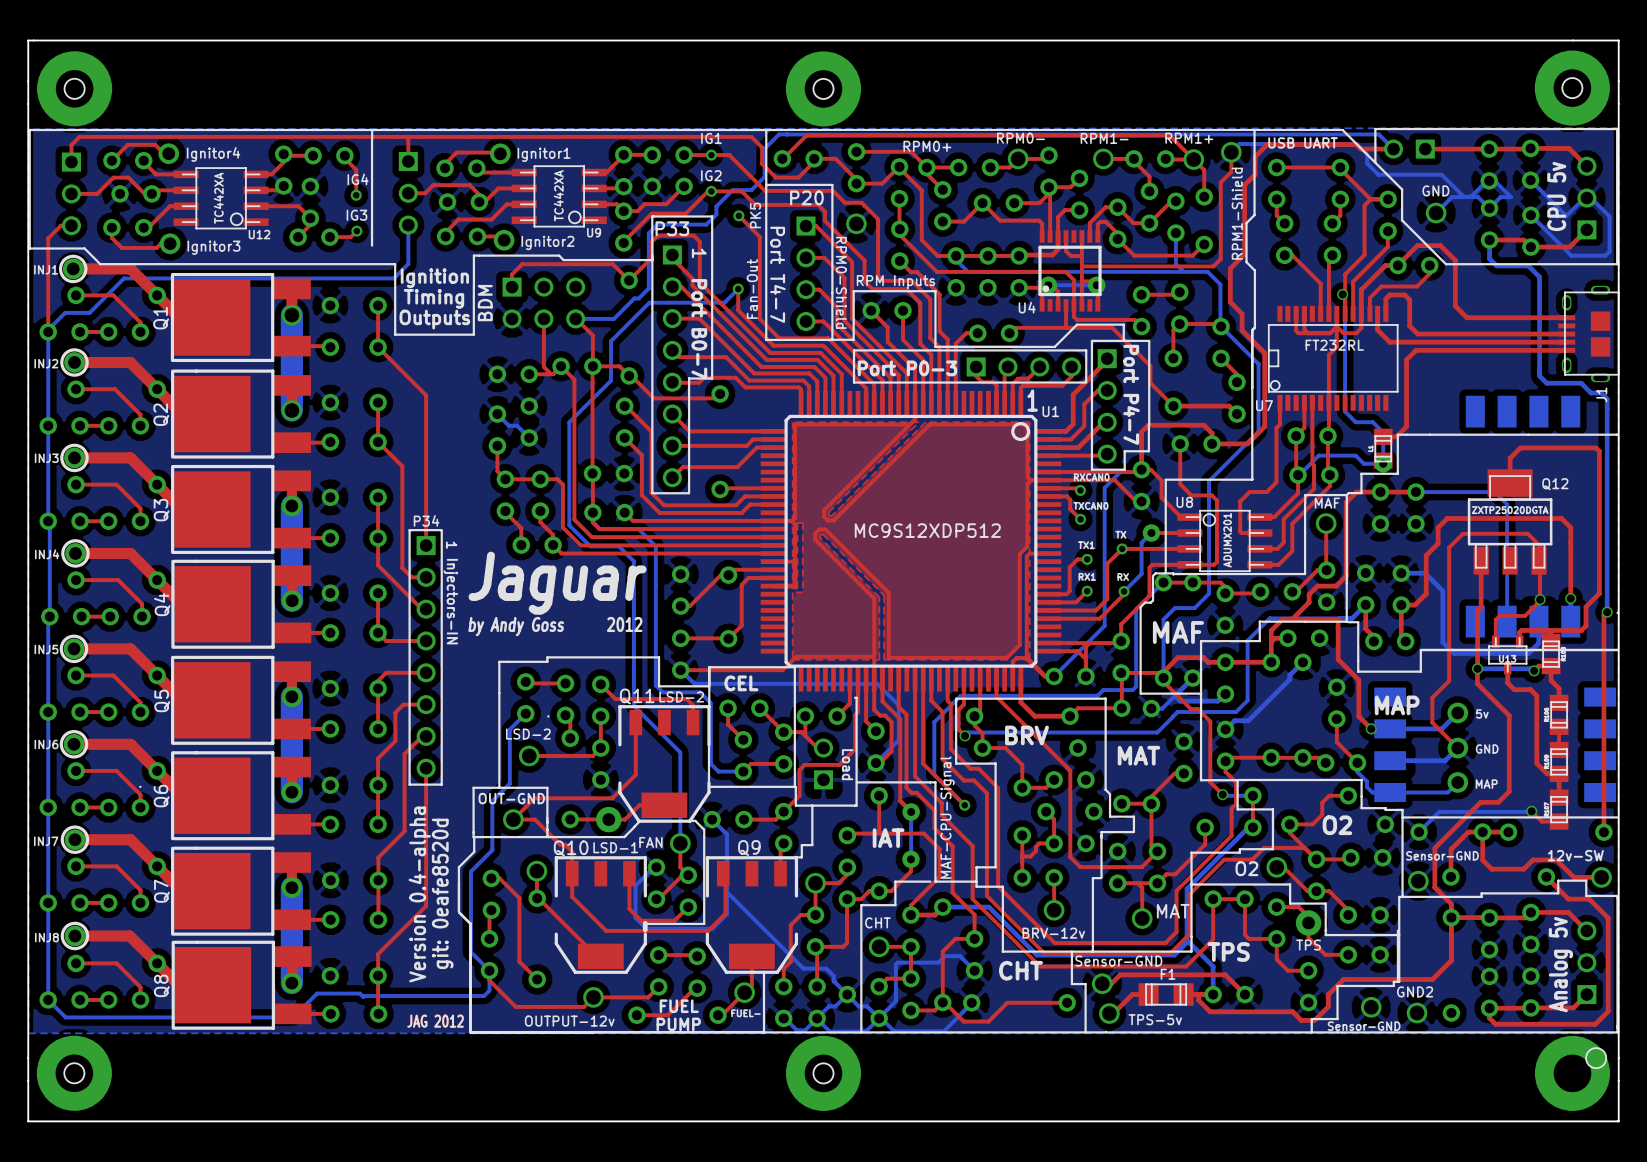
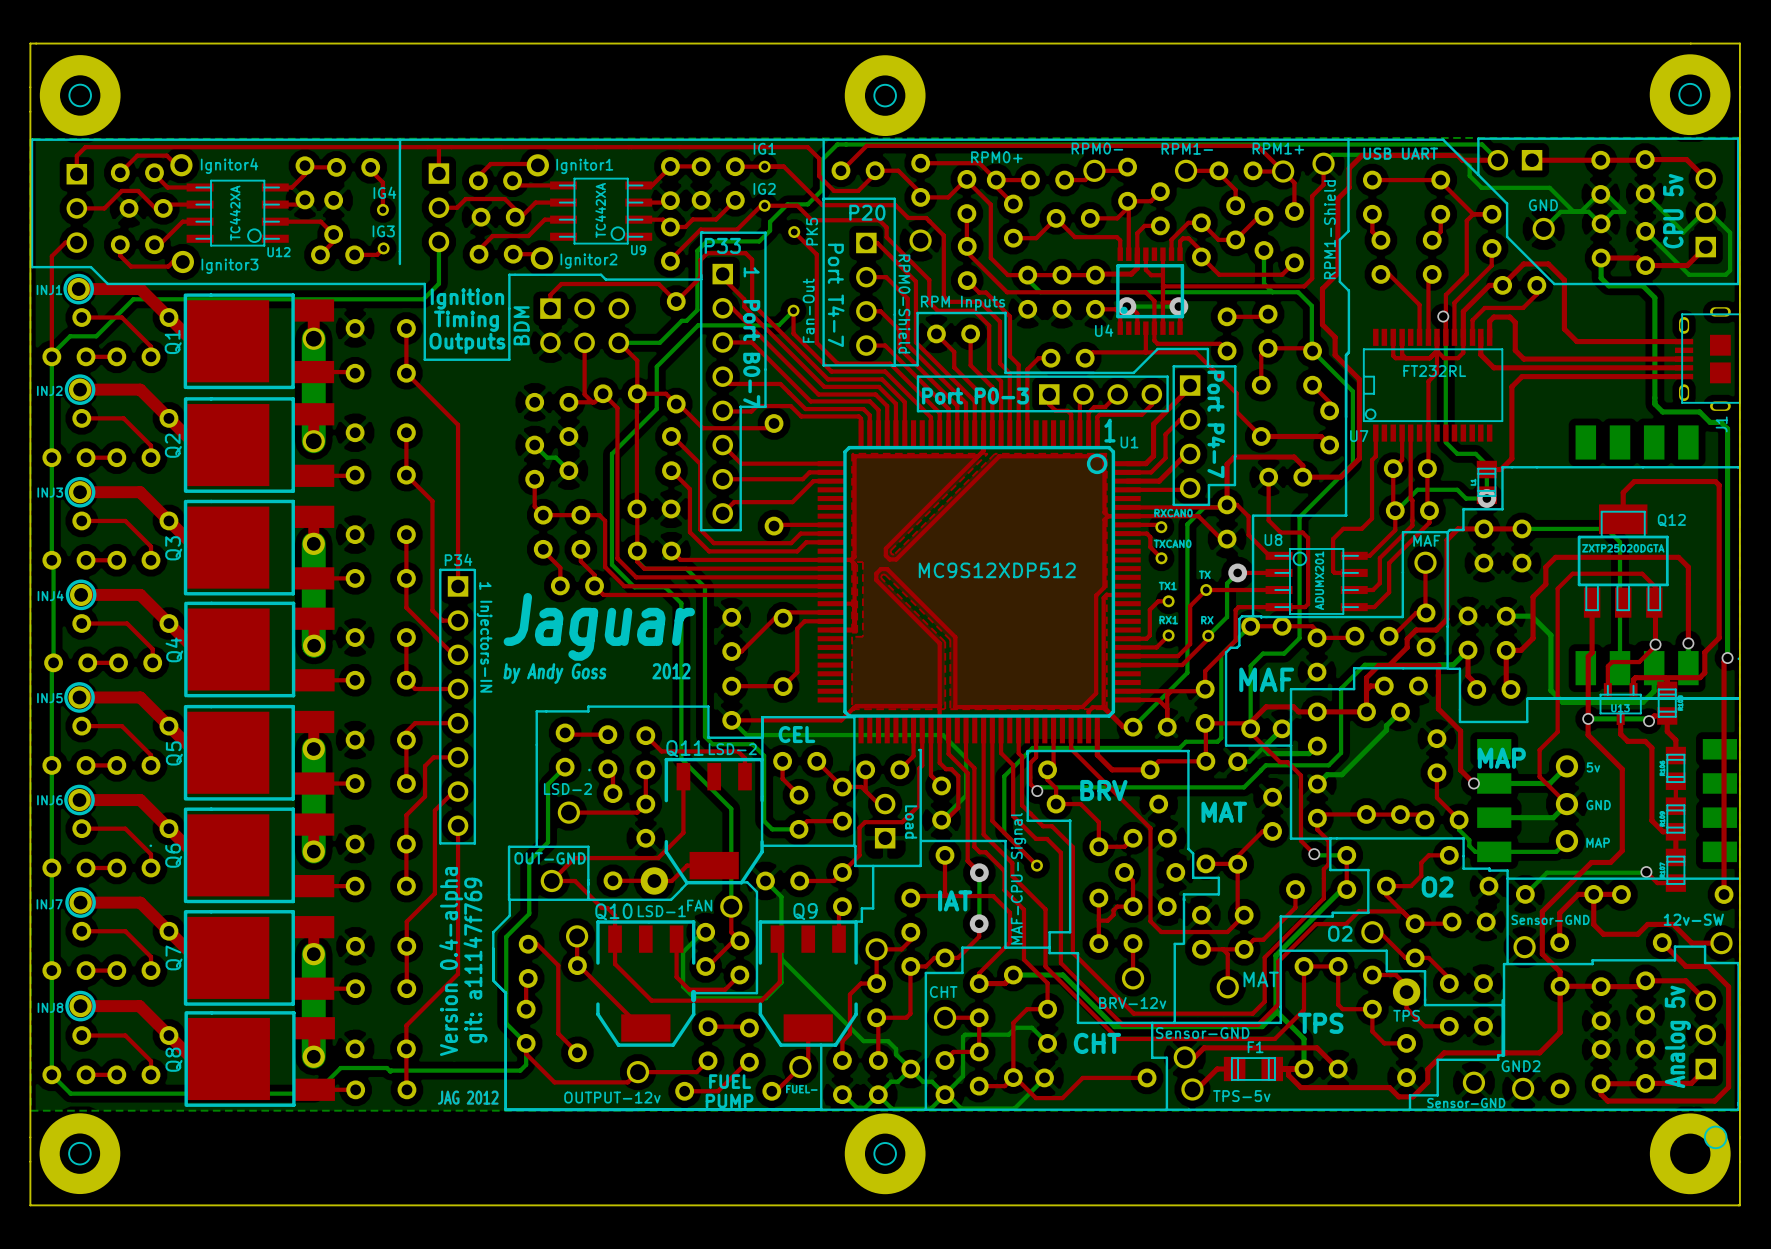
text: git: 0eafe8520d (442, 893) -> git: a11147f769 (475, 960)

